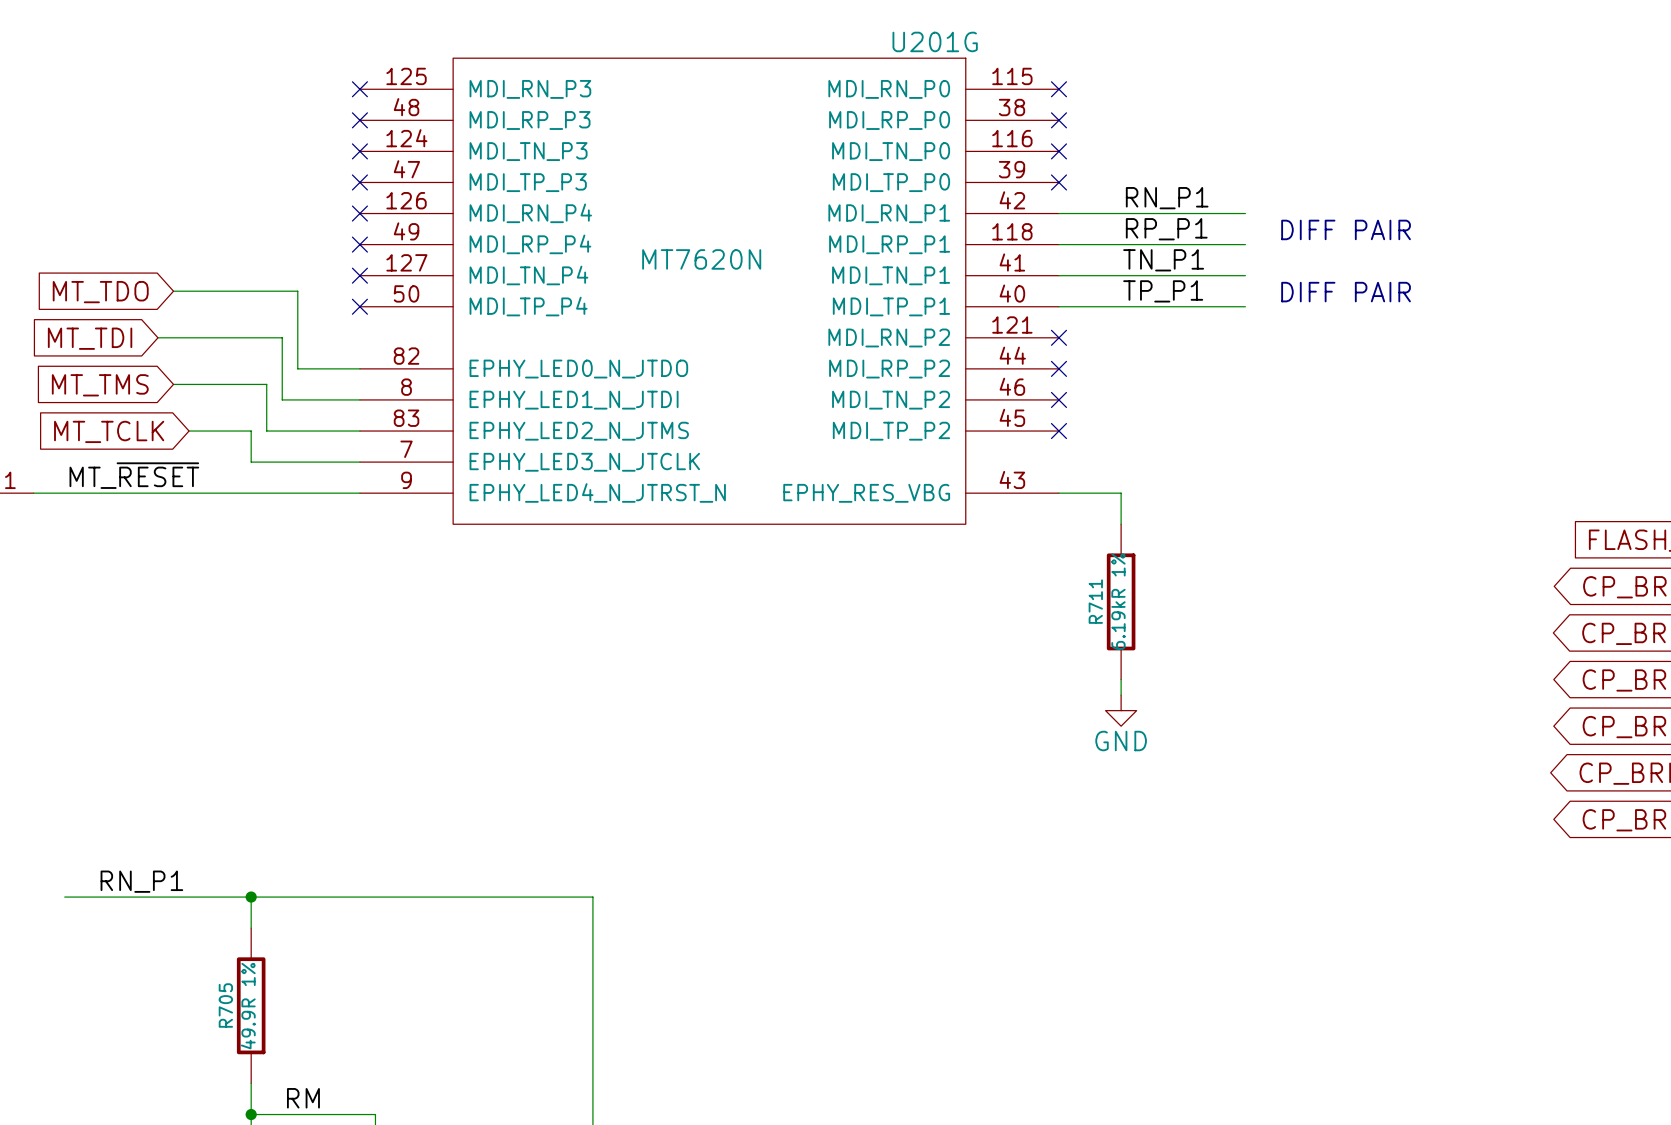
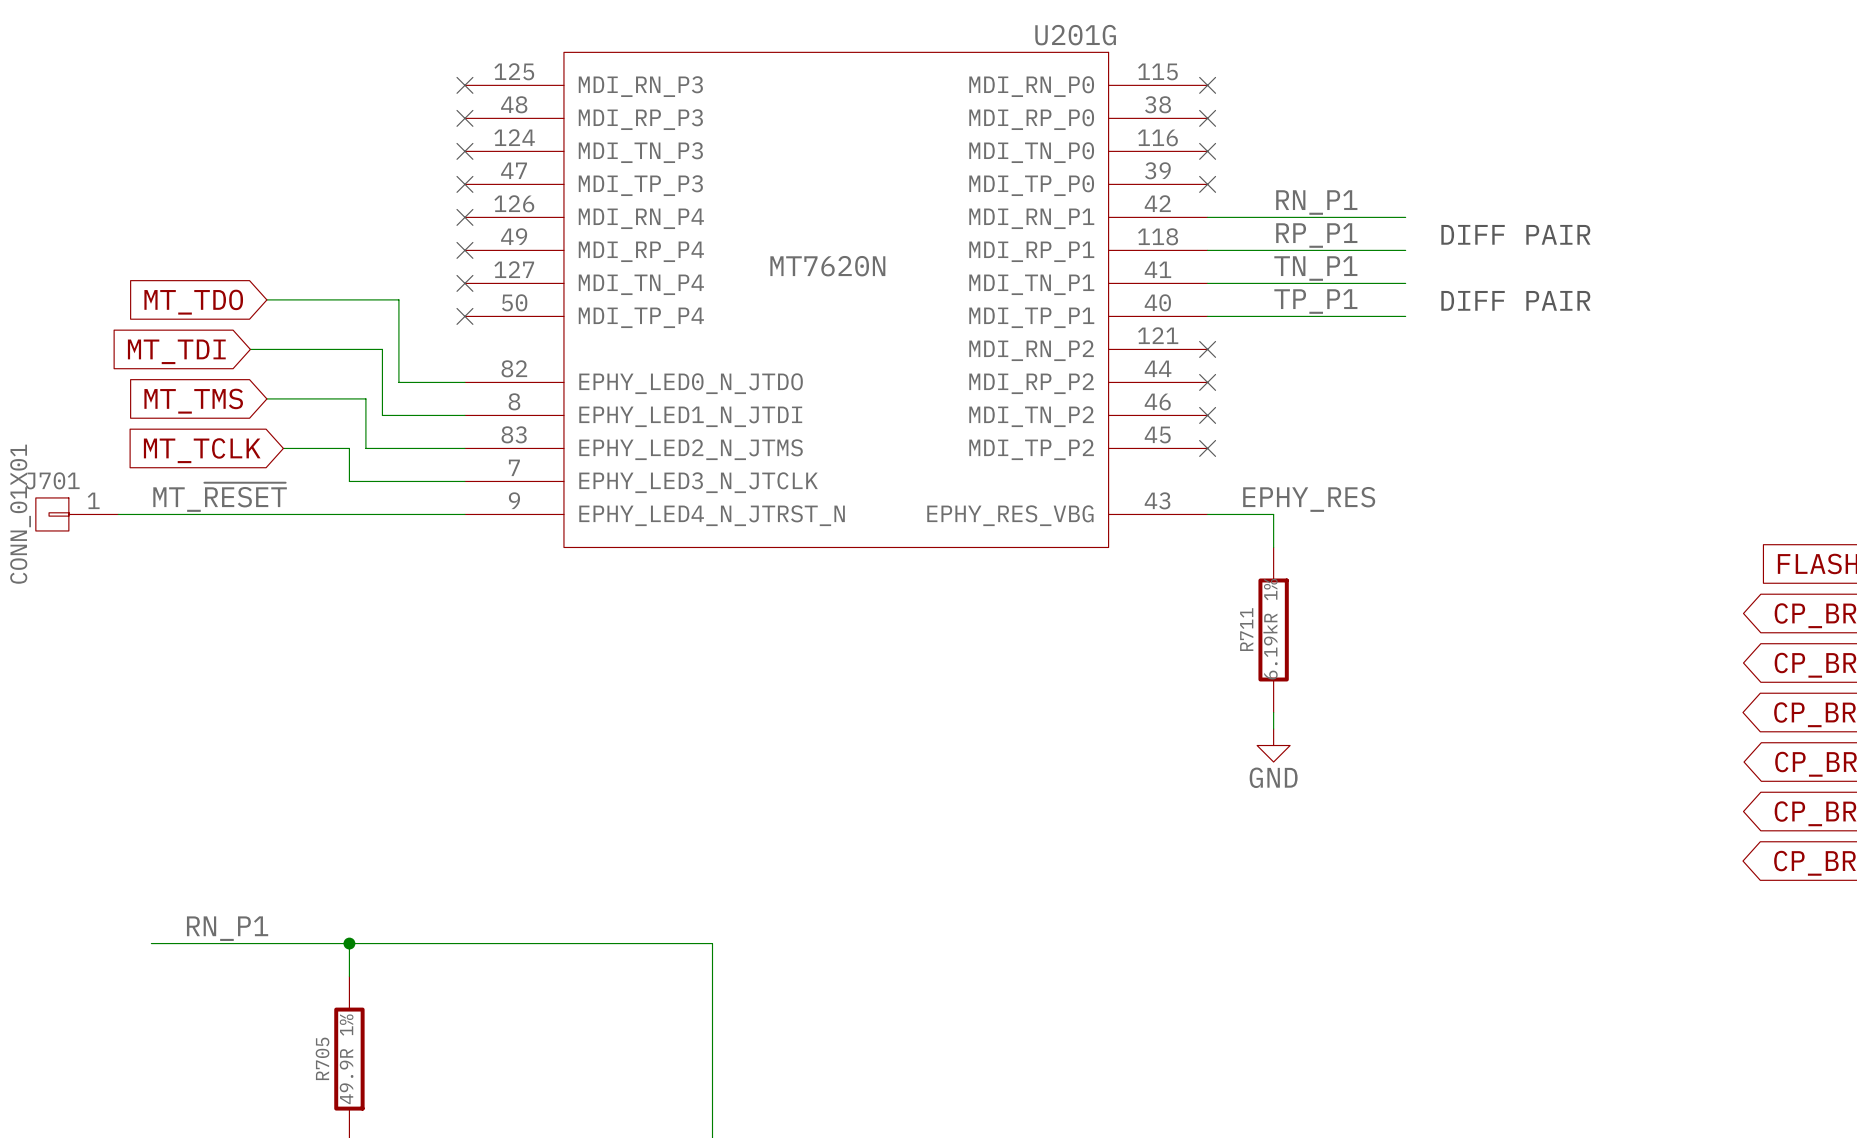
label: none -> EPHY_RES (1309, 499)

